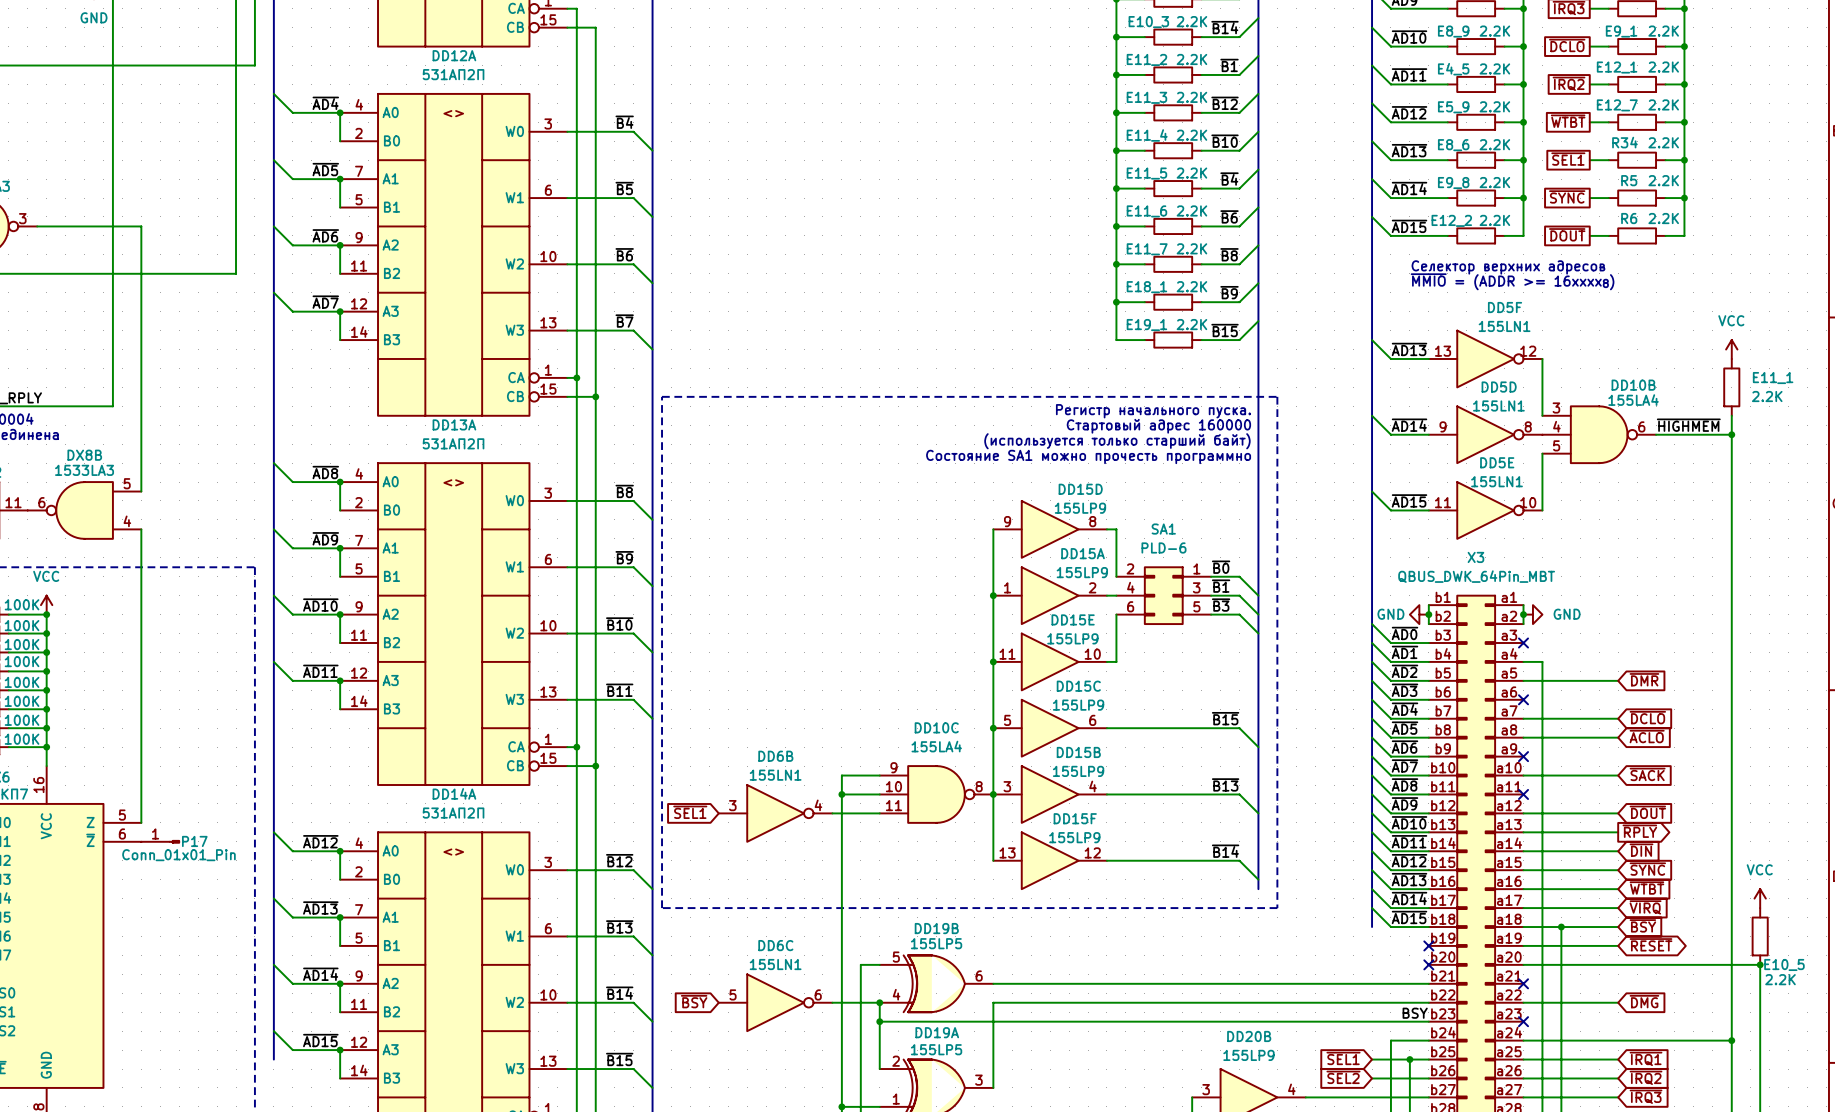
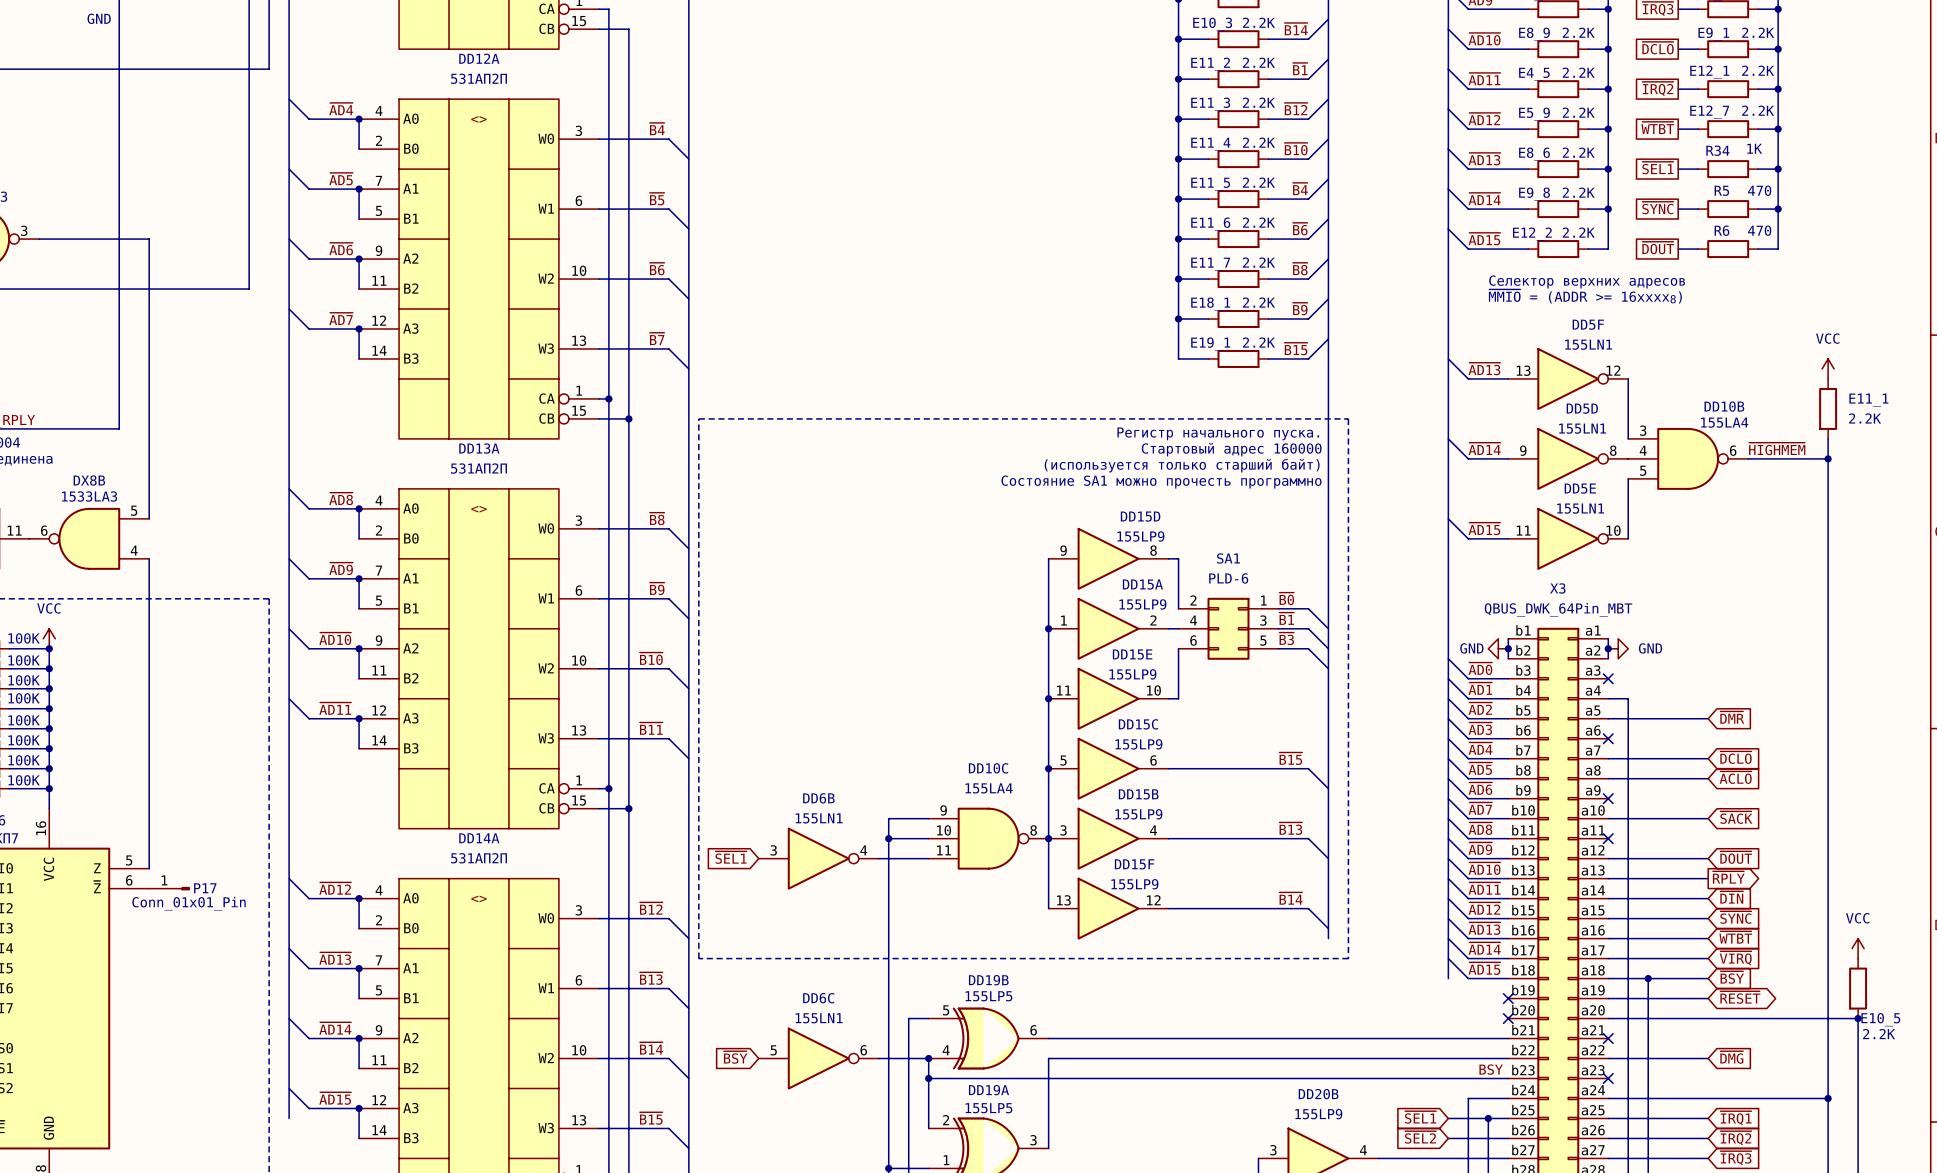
R34 value: 2.2K (1663, 142) -> 1K (1754, 148)
R5 value: 2.2K (1663, 180) -> 470 (1759, 190)
R6 value: 2.2K (1663, 218) -> 470 (1759, 230)

